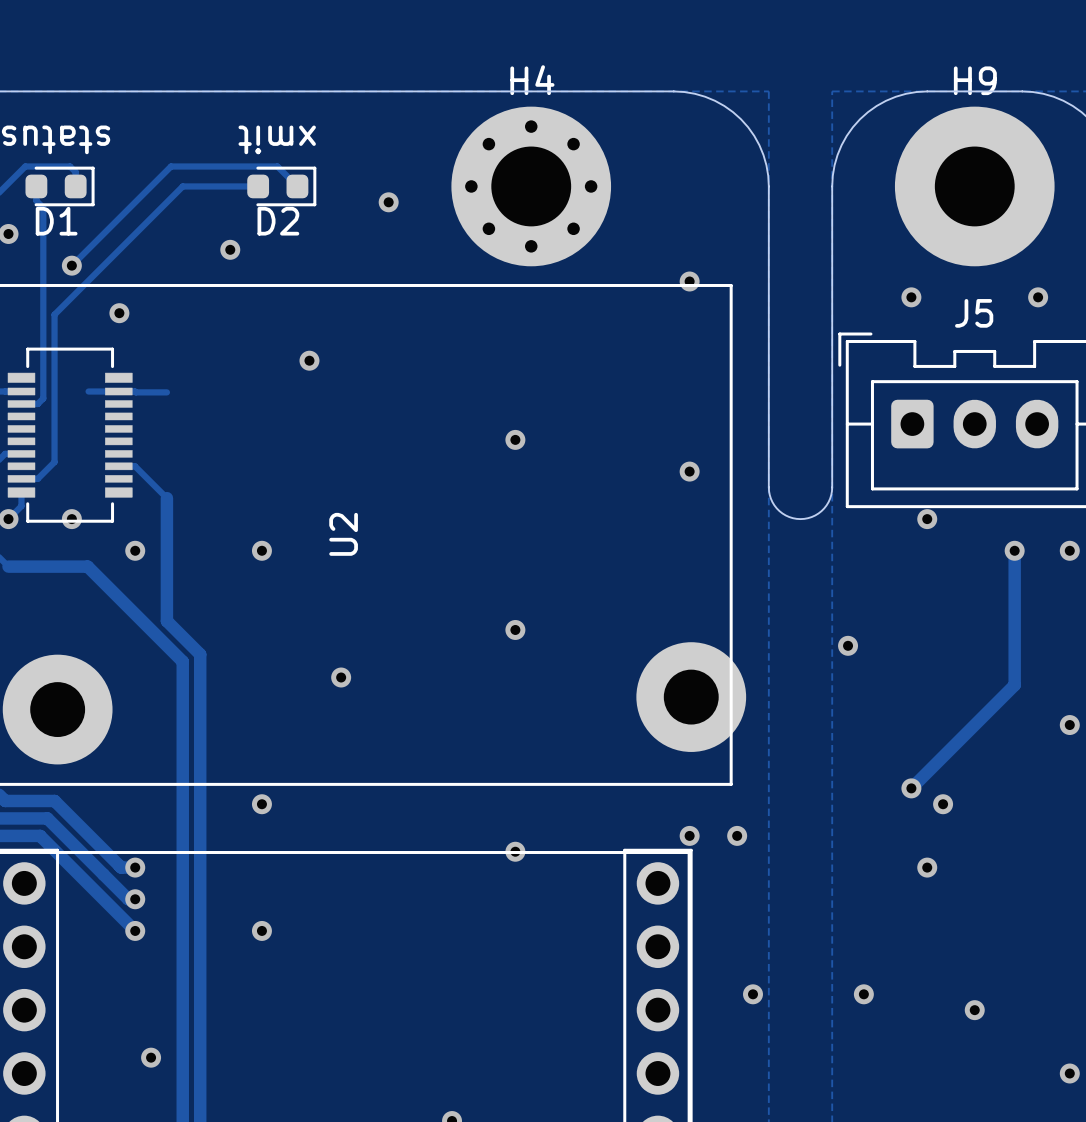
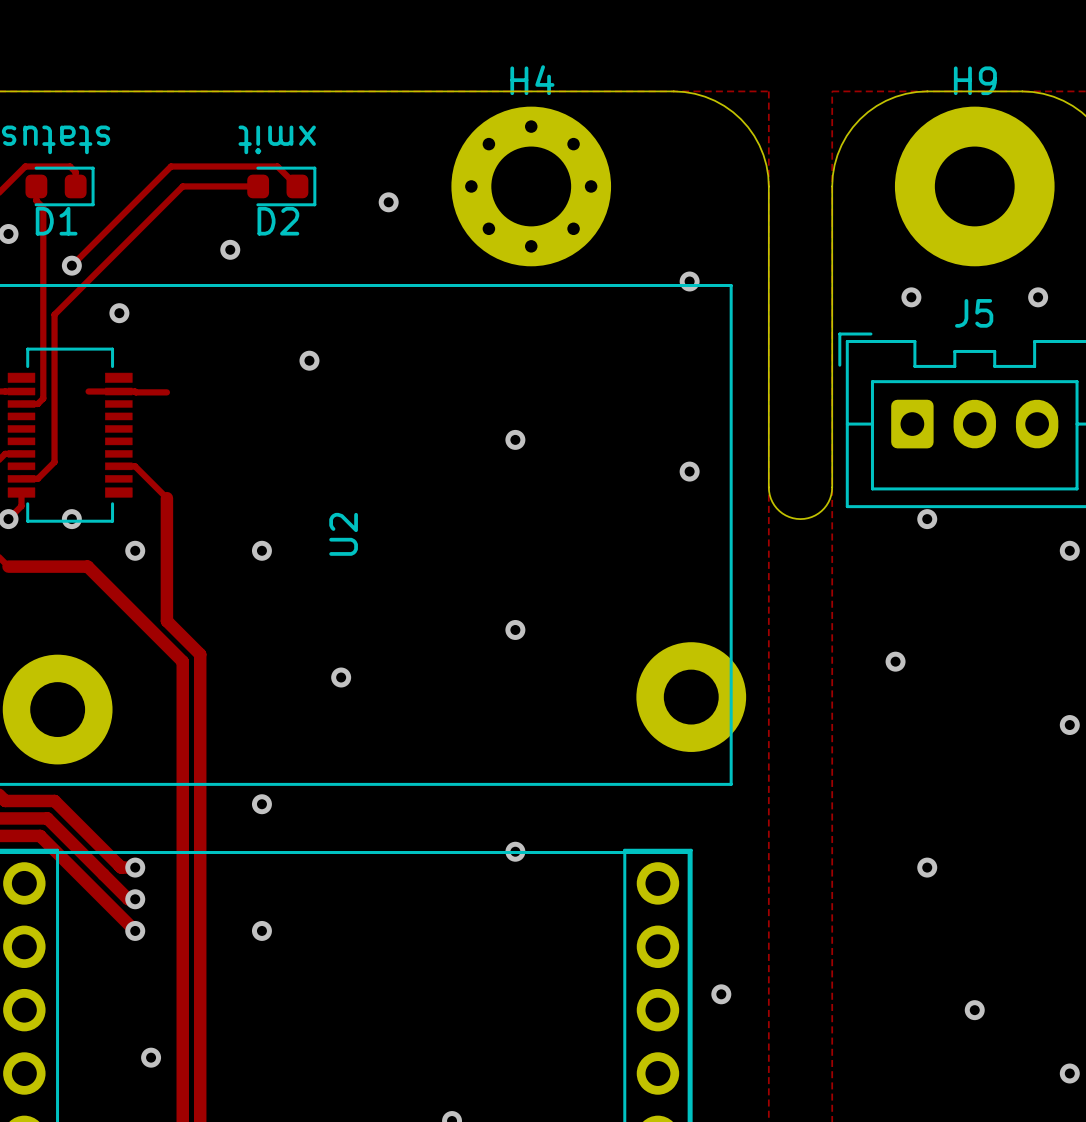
track: (1014, 550) (1014, 685) (911, 788) -> none
via: (1014, 550) -> none
via position: (848, 645) -> (895, 661)
via: (911, 788) -> none
via: (943, 804) -> none
via: (689, 835) -> none
via: (737, 835) -> none
via position: (753, 994) -> (721, 994)
via: (863, 994) -> none

